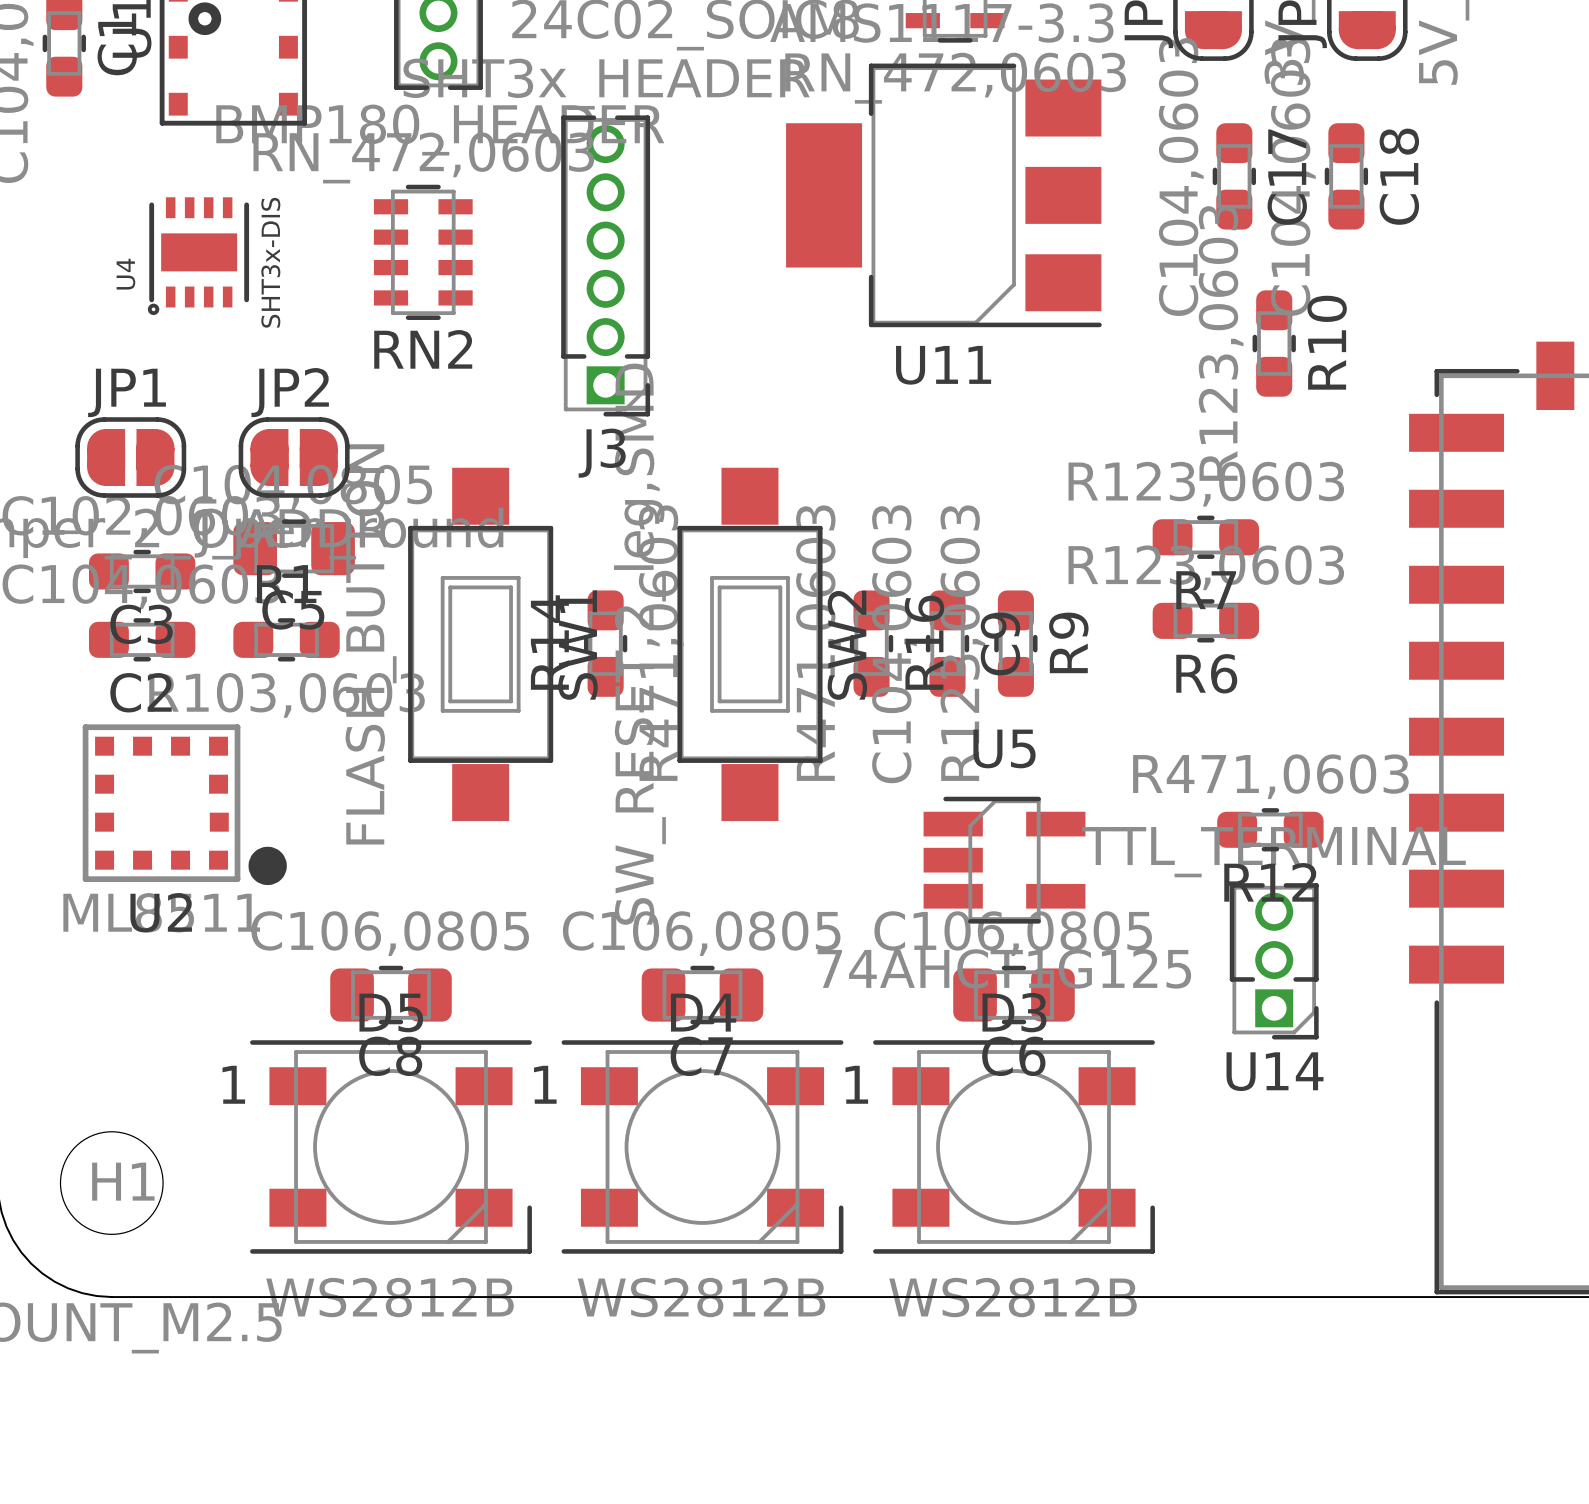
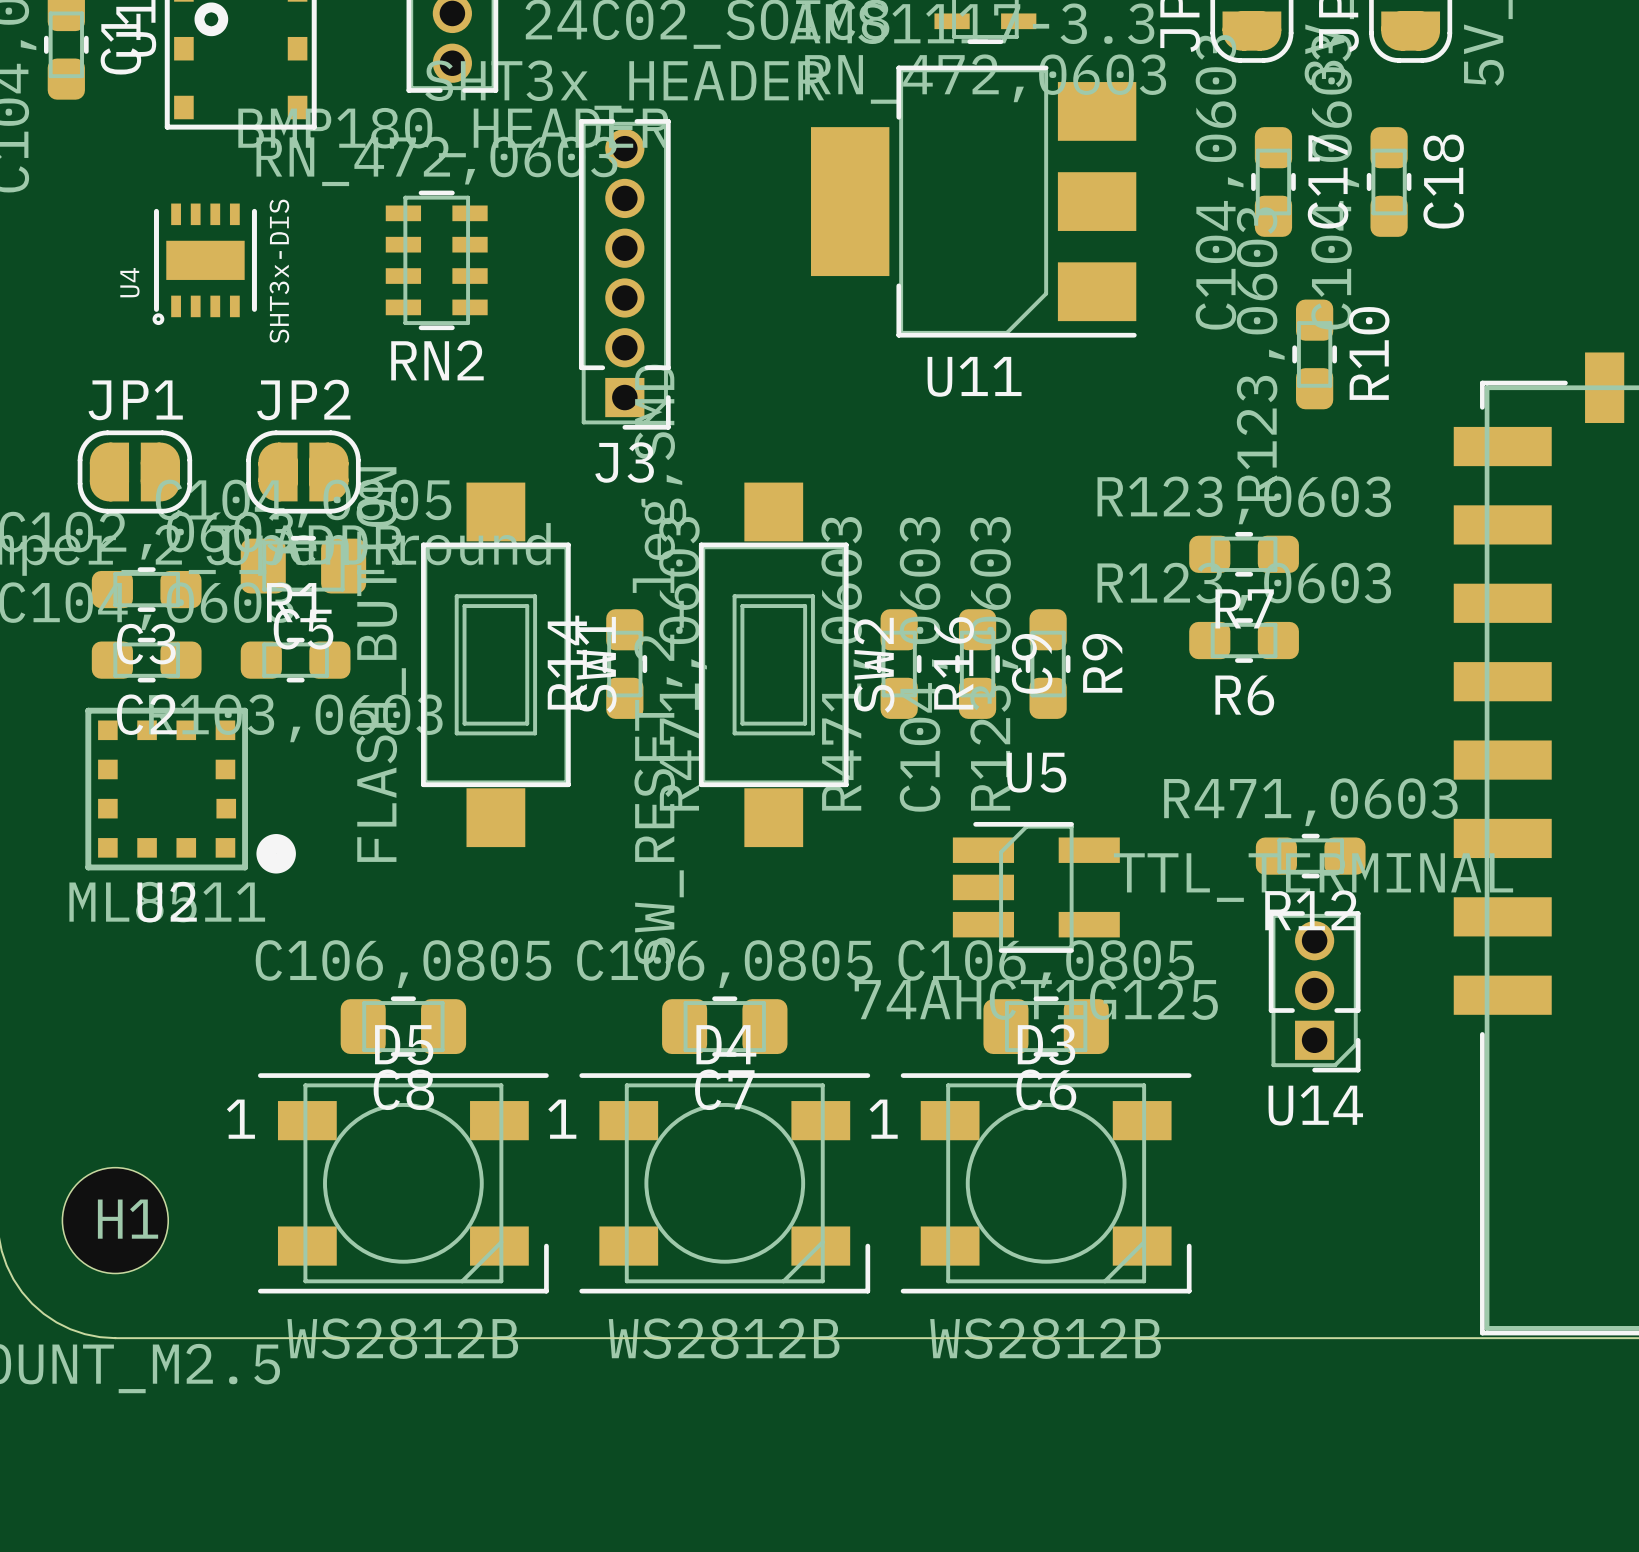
U2 position: (184, 804) -> (190, 790)

